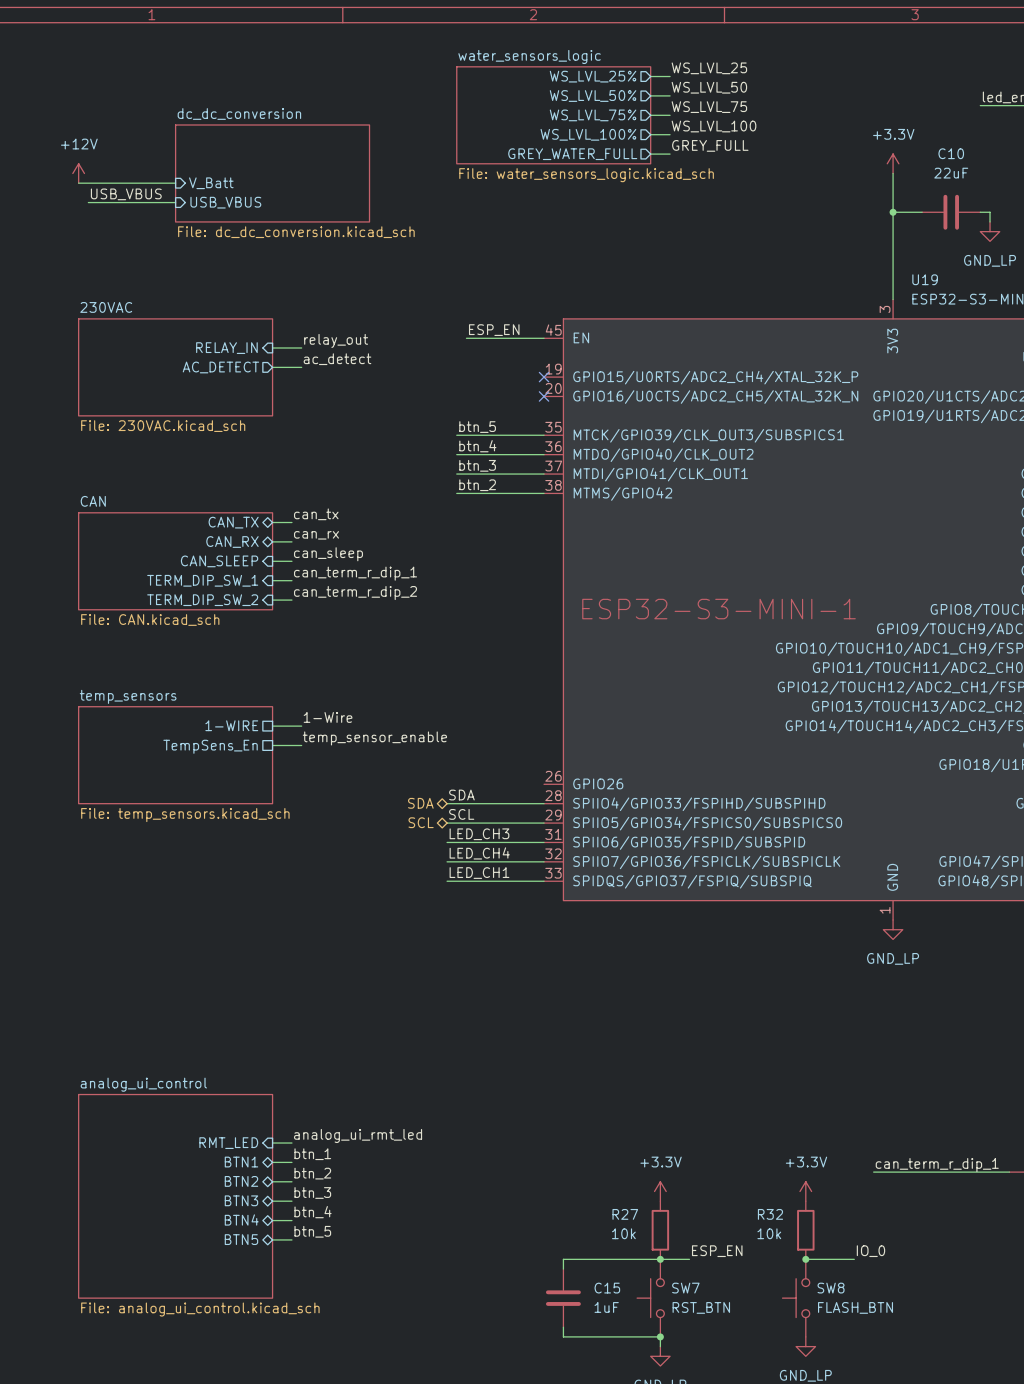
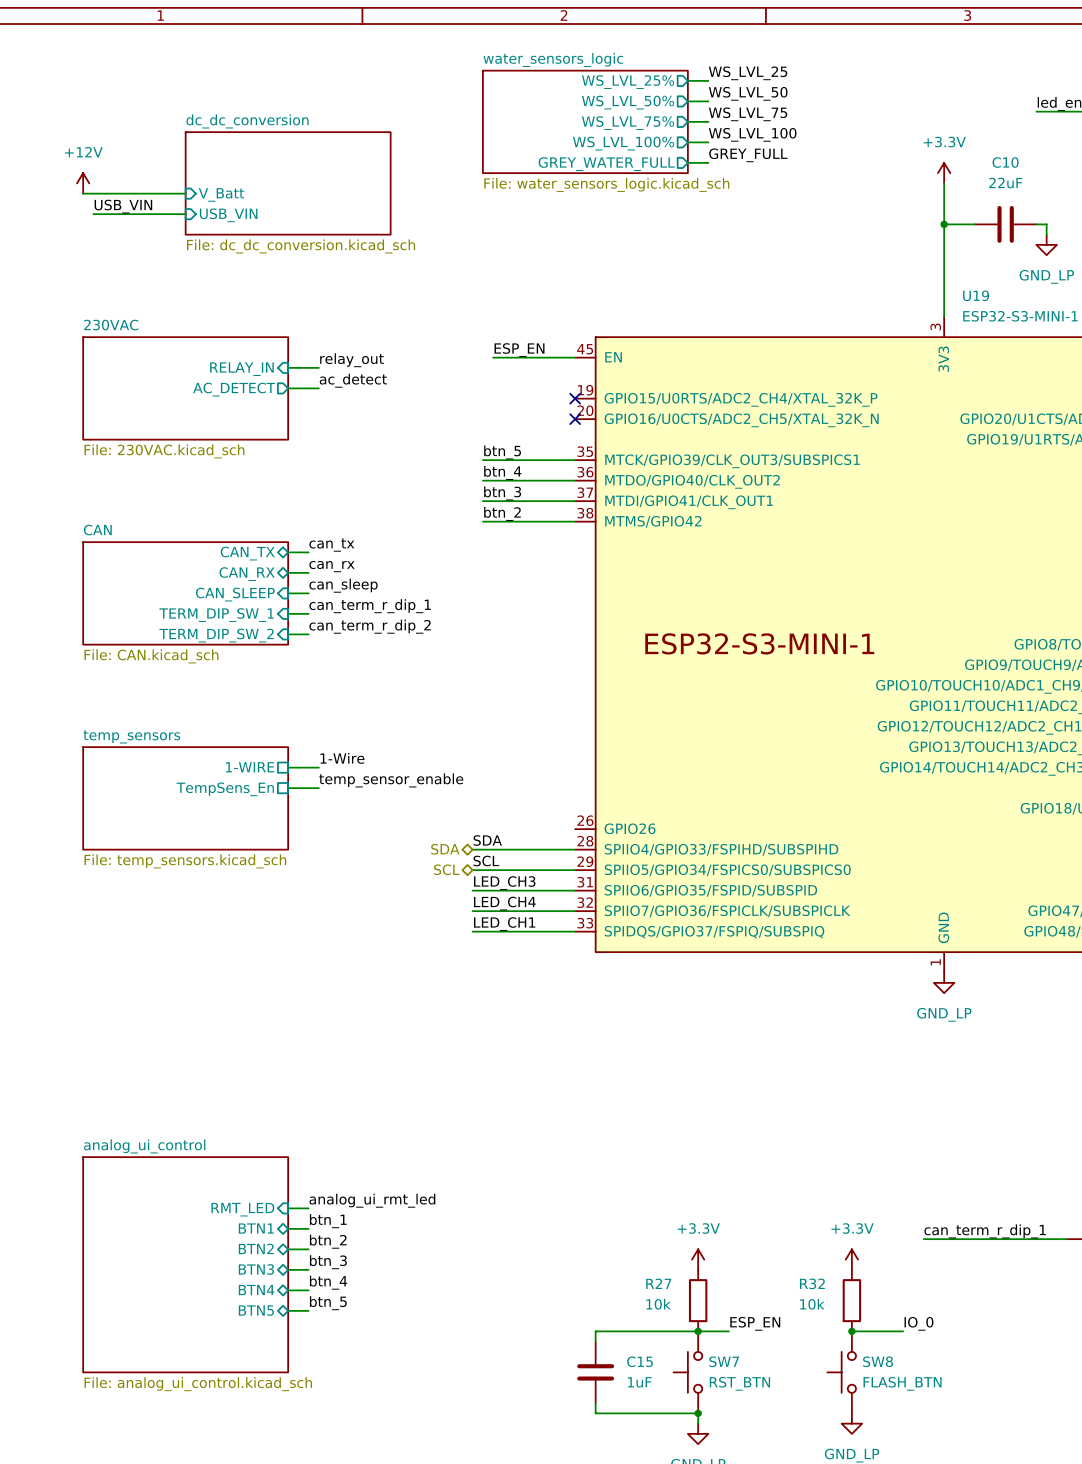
label: USB_VBUS (126, 194) -> USB_VIN (123, 206)
sheet pin: USB_VBUS (225, 202) -> USB_VIN (228, 215)

